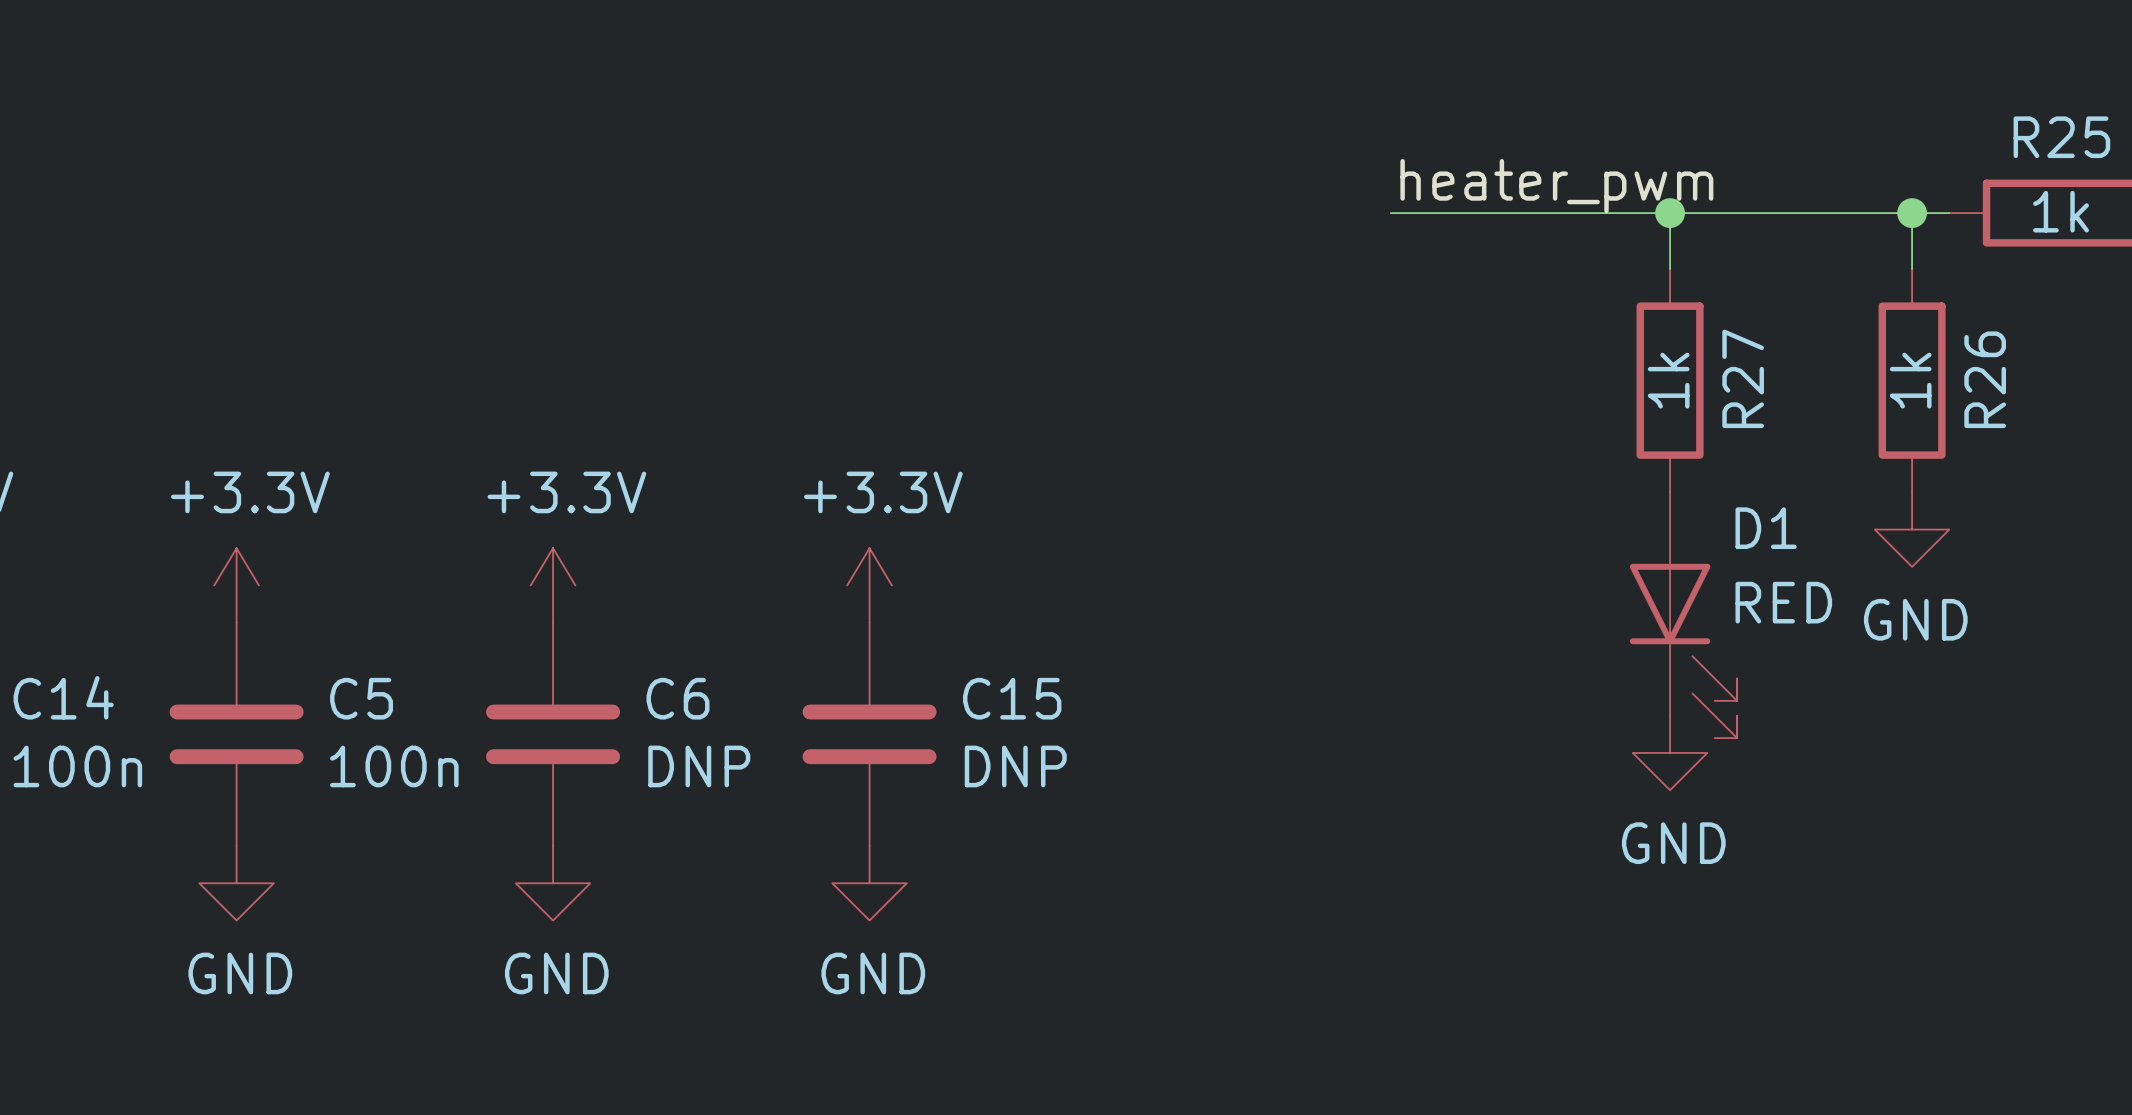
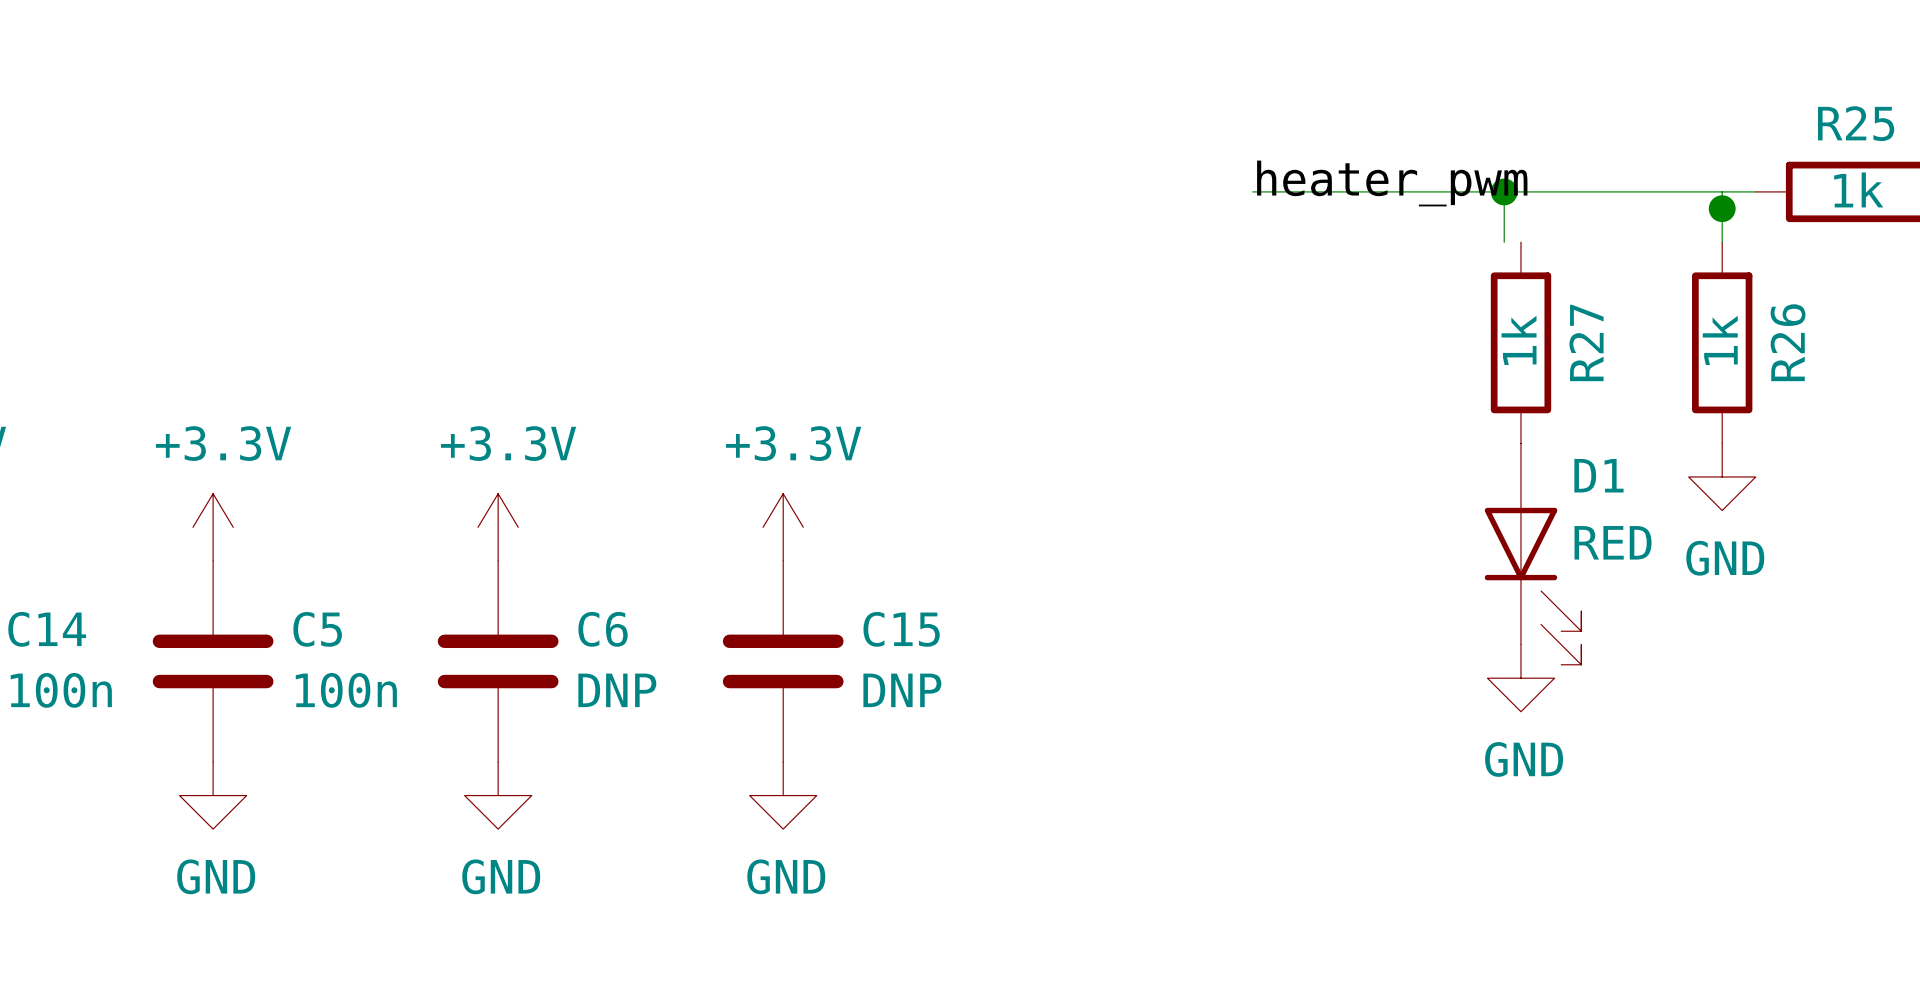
label position: heater_pwm (1556, 186) -> heater_pwm (1392, 183)
junction position: (1912, 213) -> (1722, 208)
R27 position: (1670, 380) -> (1520, 342)
D1 position: (1683, 615) -> (1533, 554)
power symbol position: GND (1670, 752) -> GND (1520, 678)

